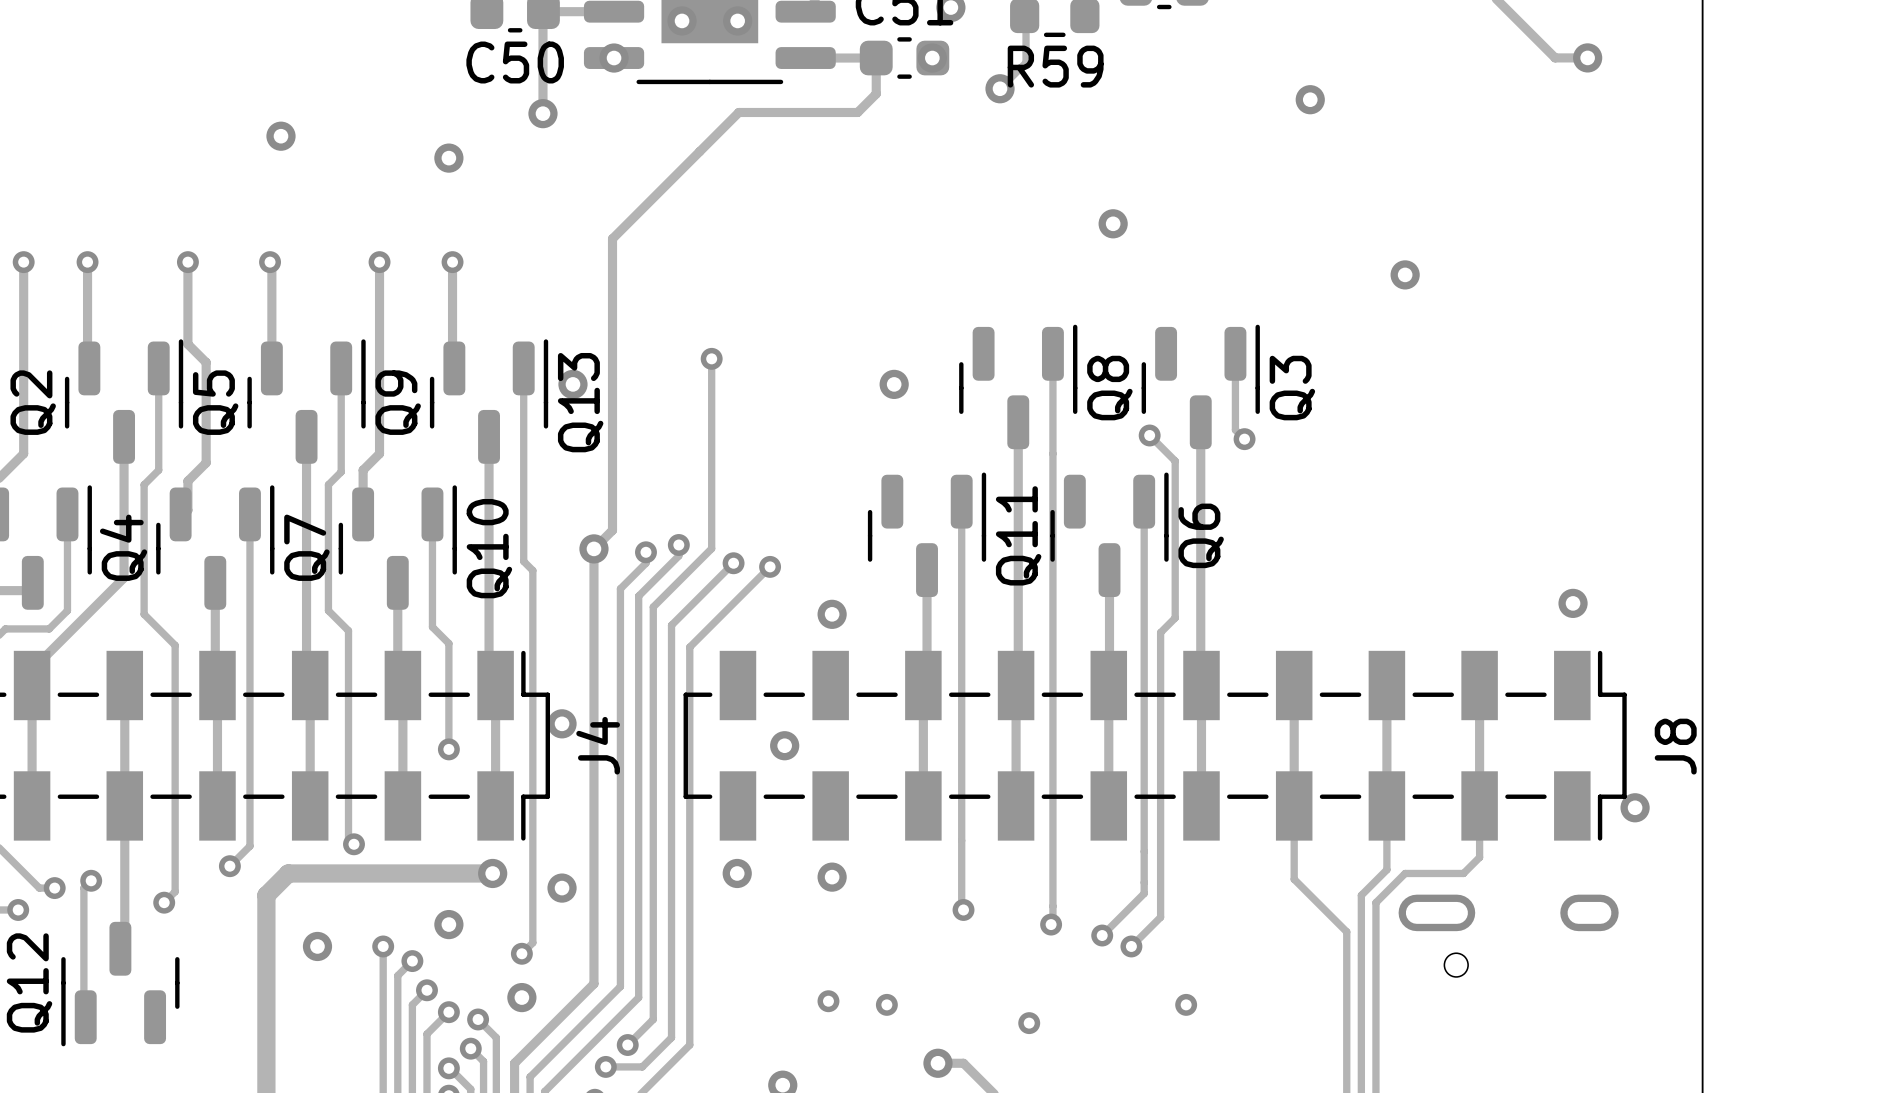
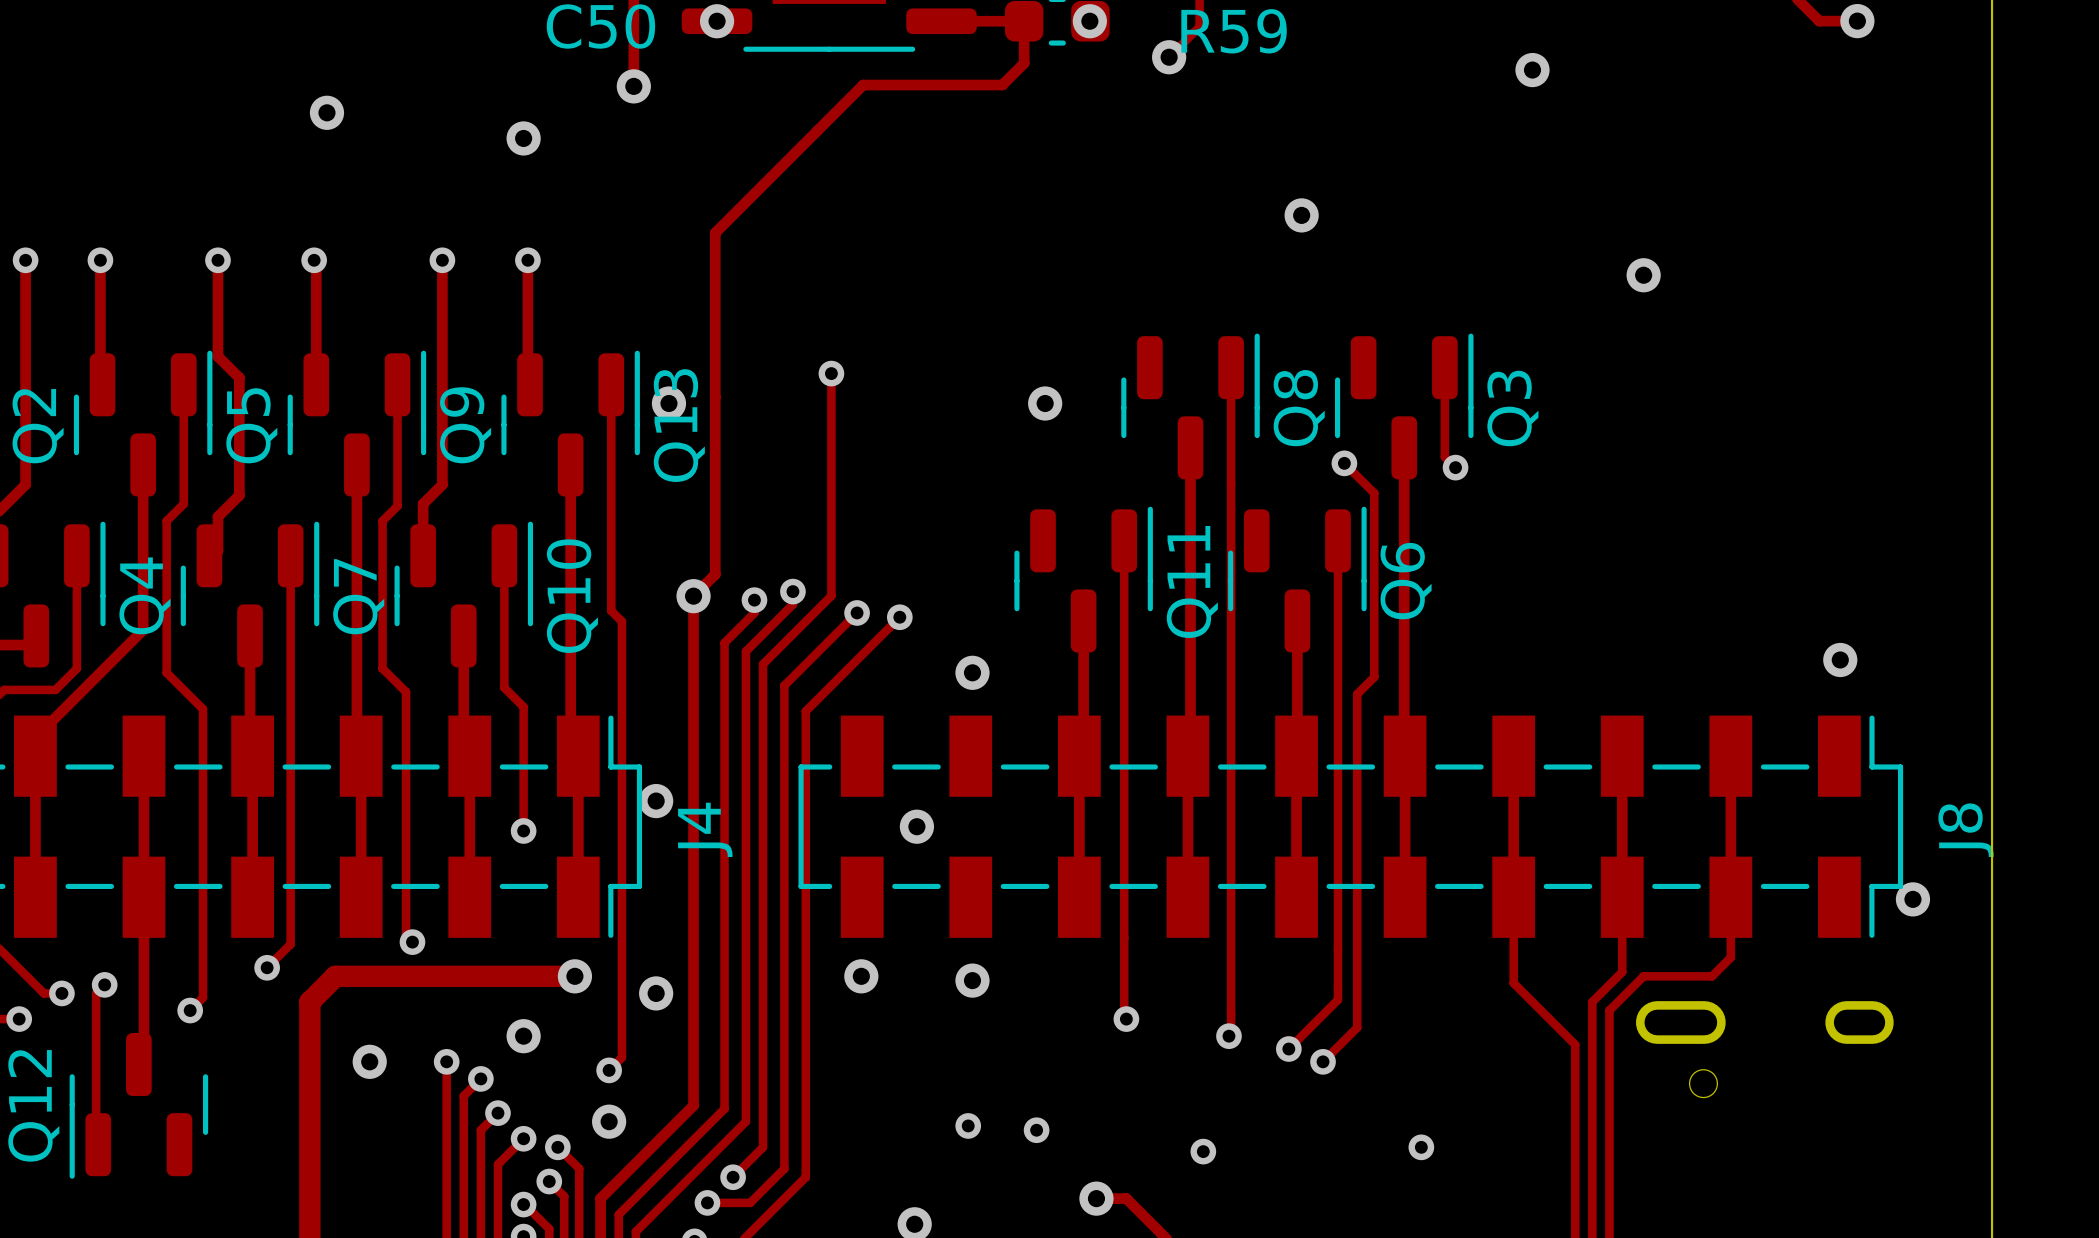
via position: (1186, 1004) -> (1421, 1147)

